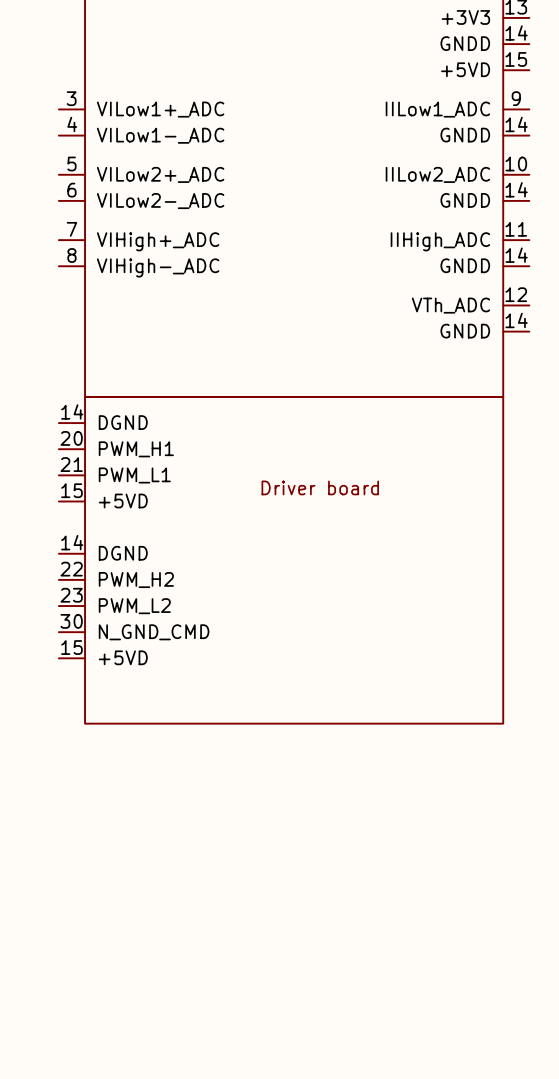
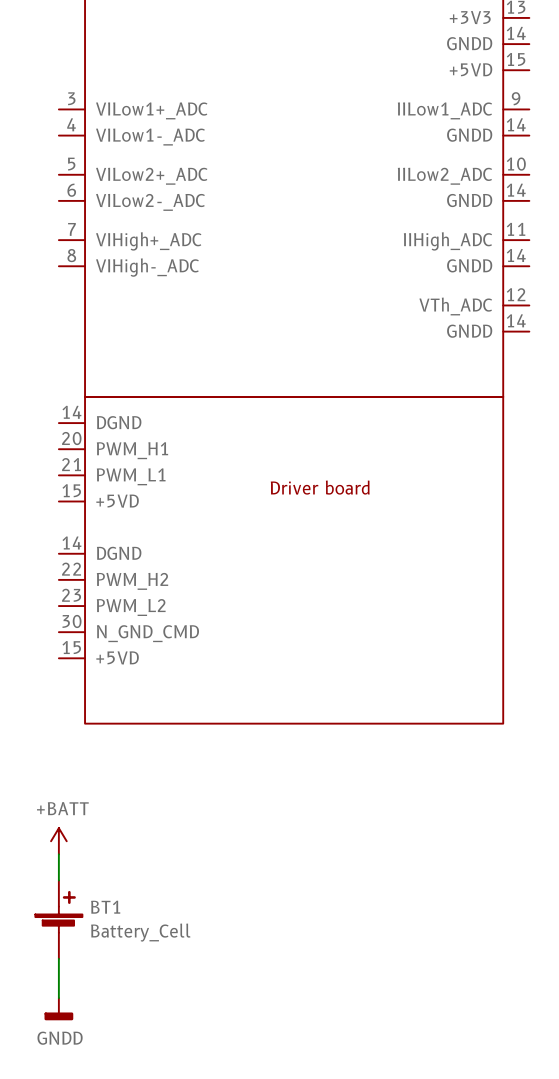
power symbol: none -> +BATT (58, 841)
wire: none -> (58, 854) (58, 880)
BT1: none -> Battery_Cell (58, 919)
wire: none -> (58, 958) (58, 998)
power symbol: none -> GNDD (58, 1009)

